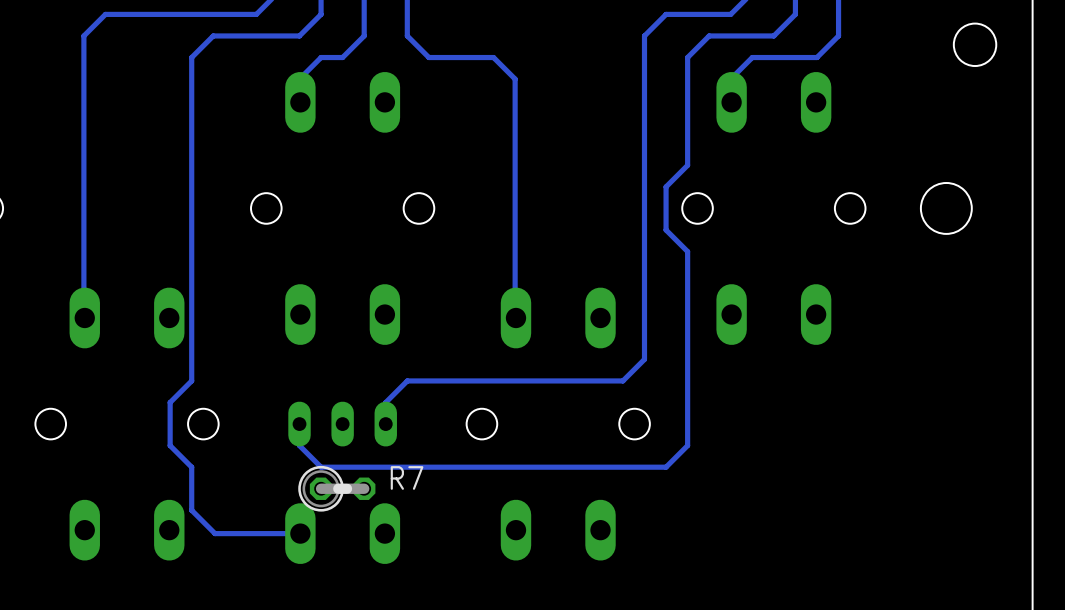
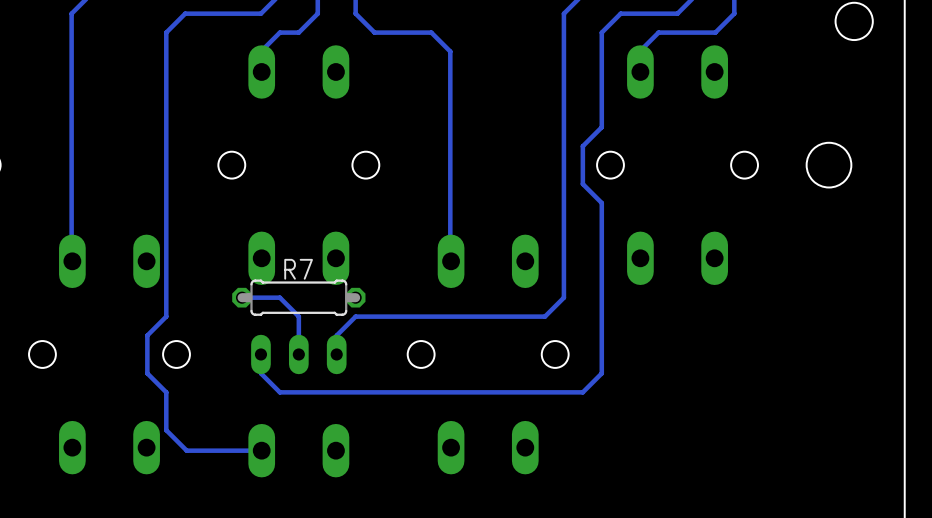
track: none -> (242, 297) (279, 297) (298, 316) (298, 354)
R7 footprint: [298, 465, 376, 512] -> [232, 279, 366, 316]
R7 name position: R7 (407, 477) -> R7 (298, 269)

